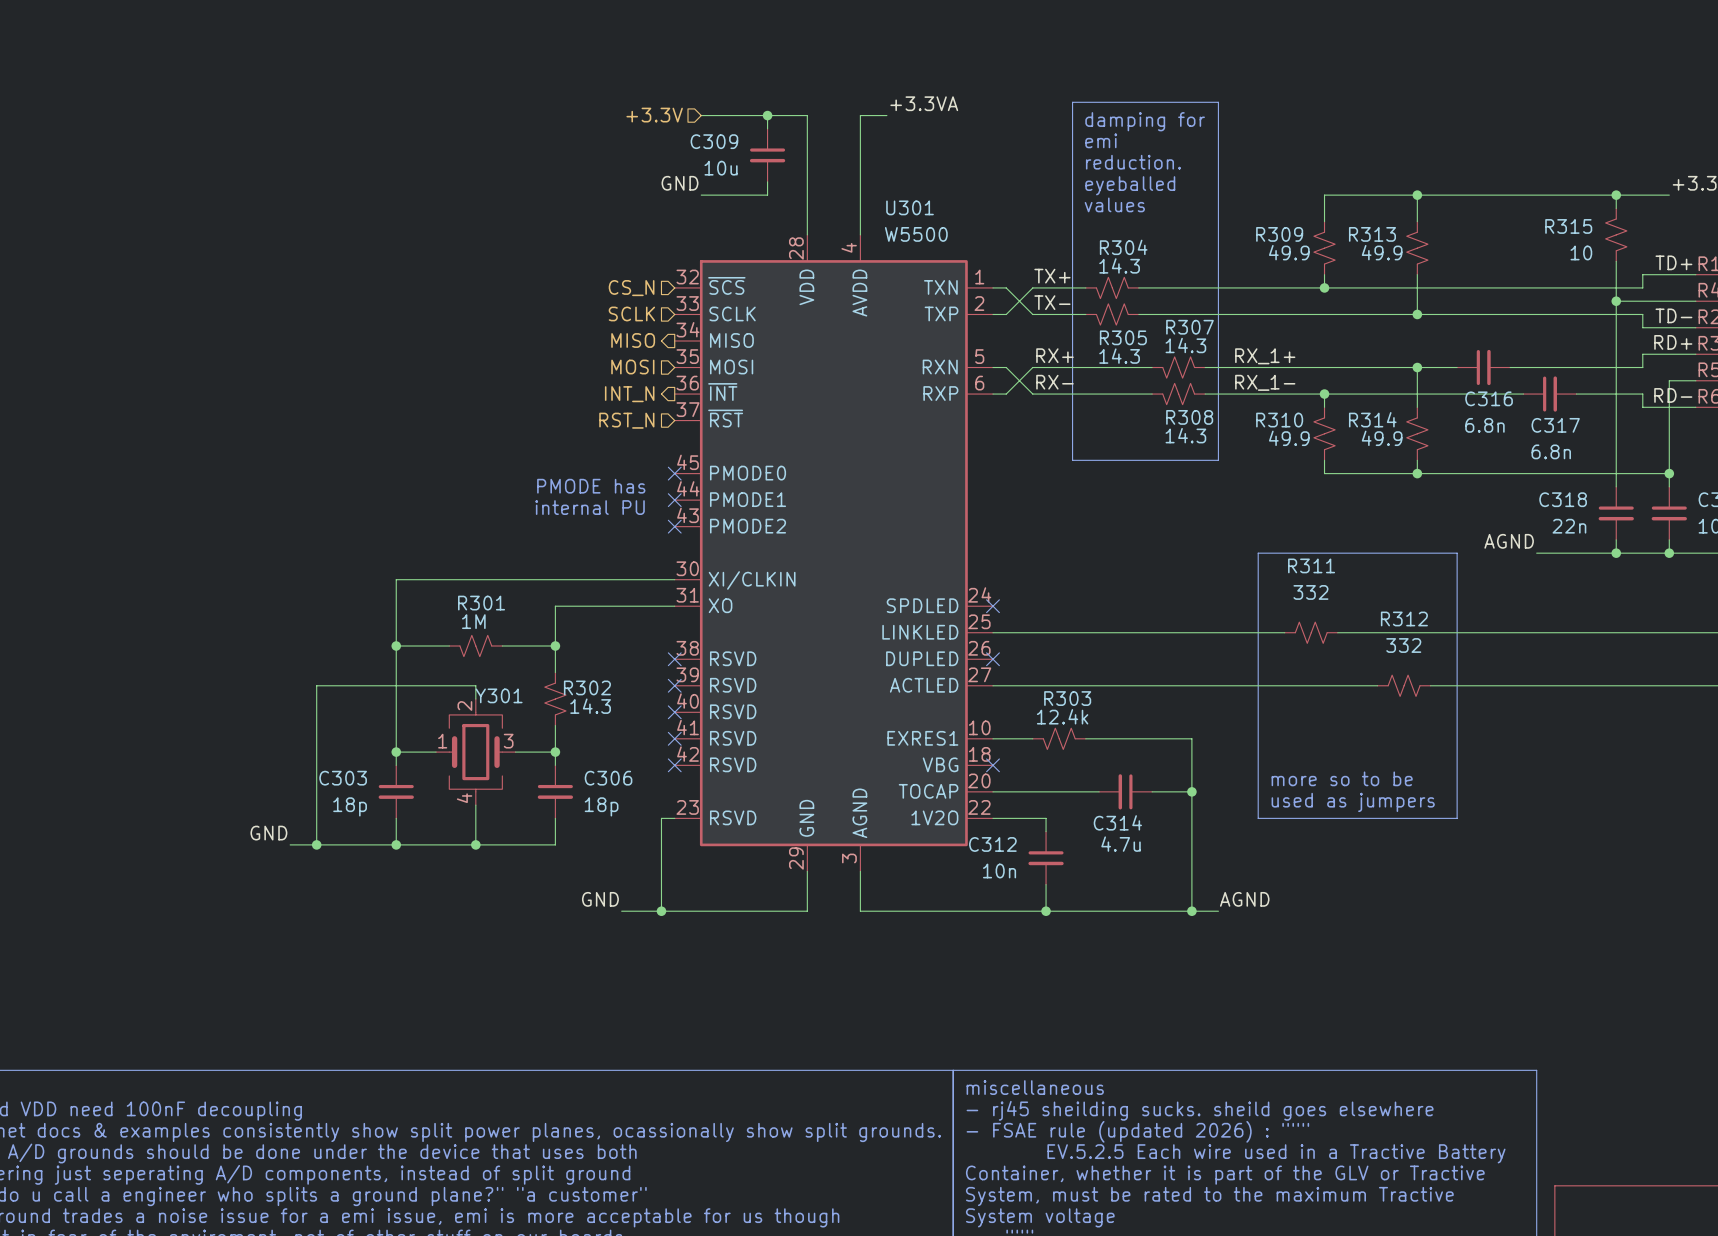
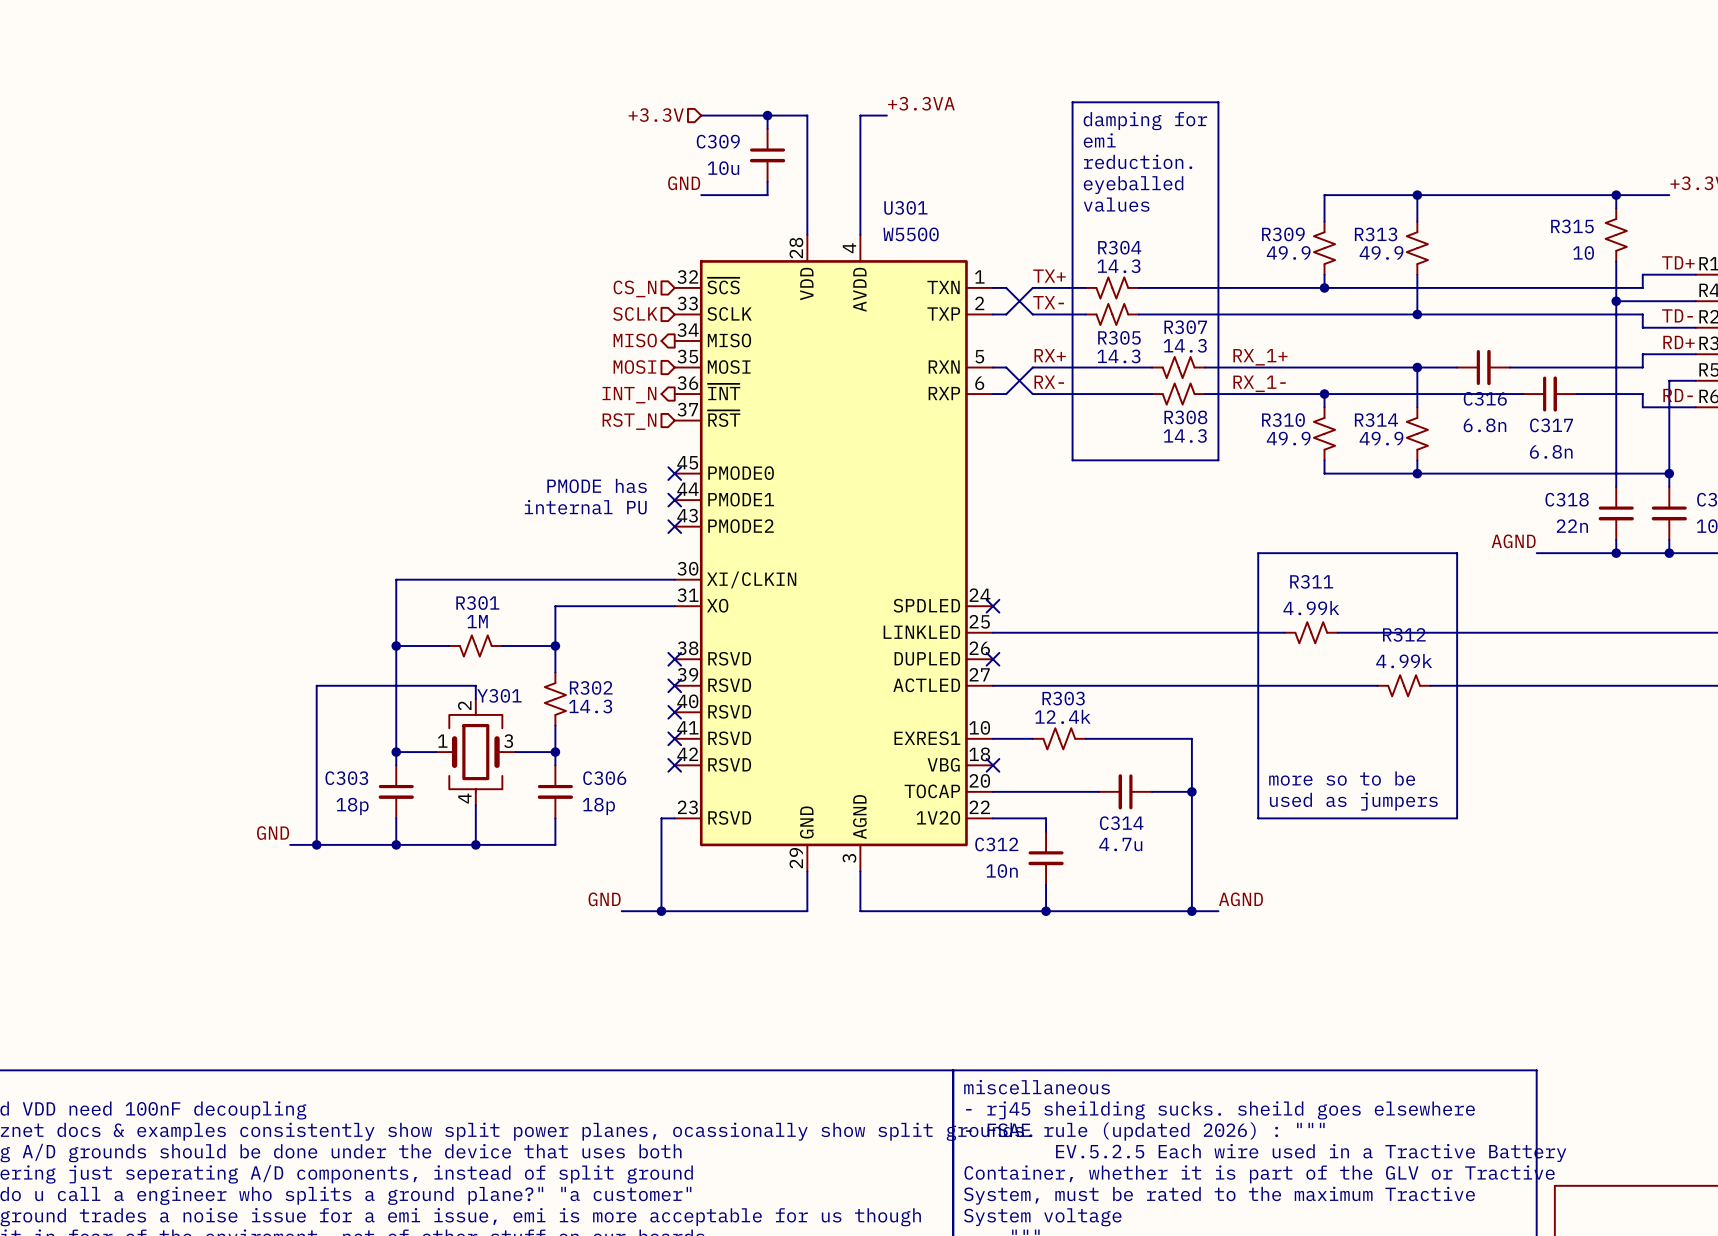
R311 value: 332 (1310, 592) -> 4.99k (1311, 608)
R311 flip: as is (1311, 632) -> left-right (1311, 632)
R312 value: 332 (1403, 645) -> 4.99k (1404, 661)
R312 flip: as is (1404, 685) -> left-right (1404, 685)

